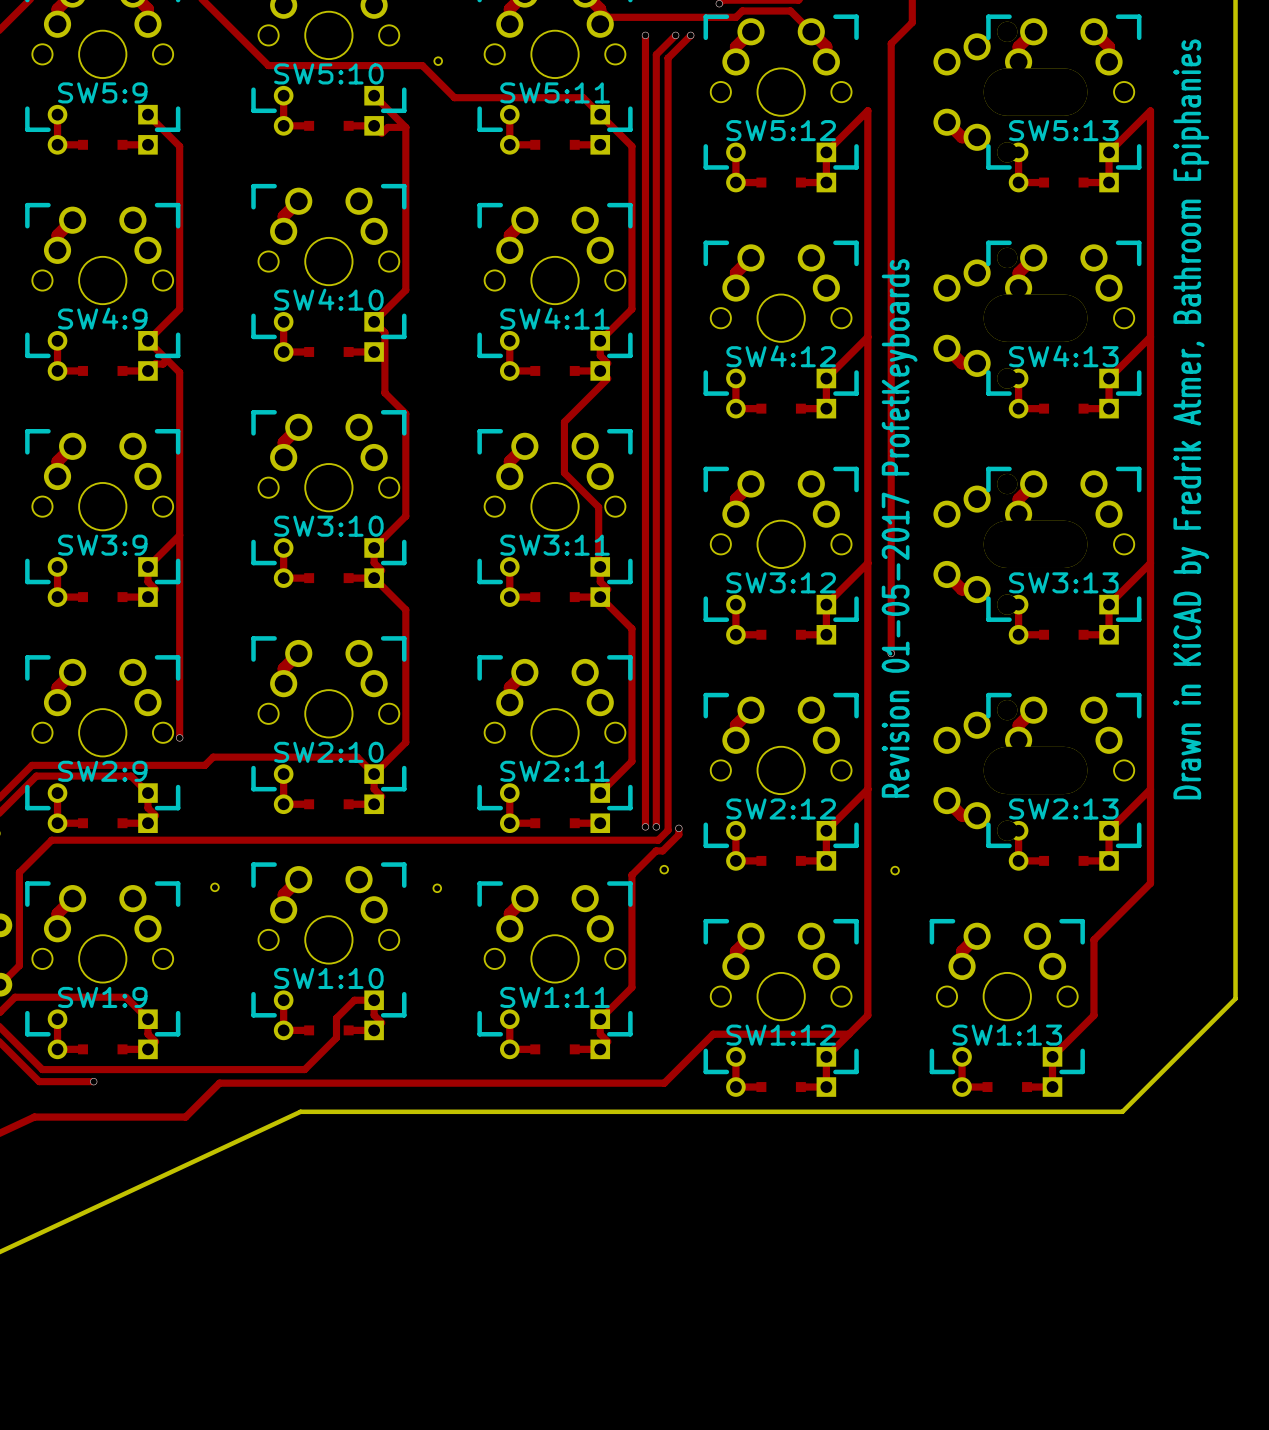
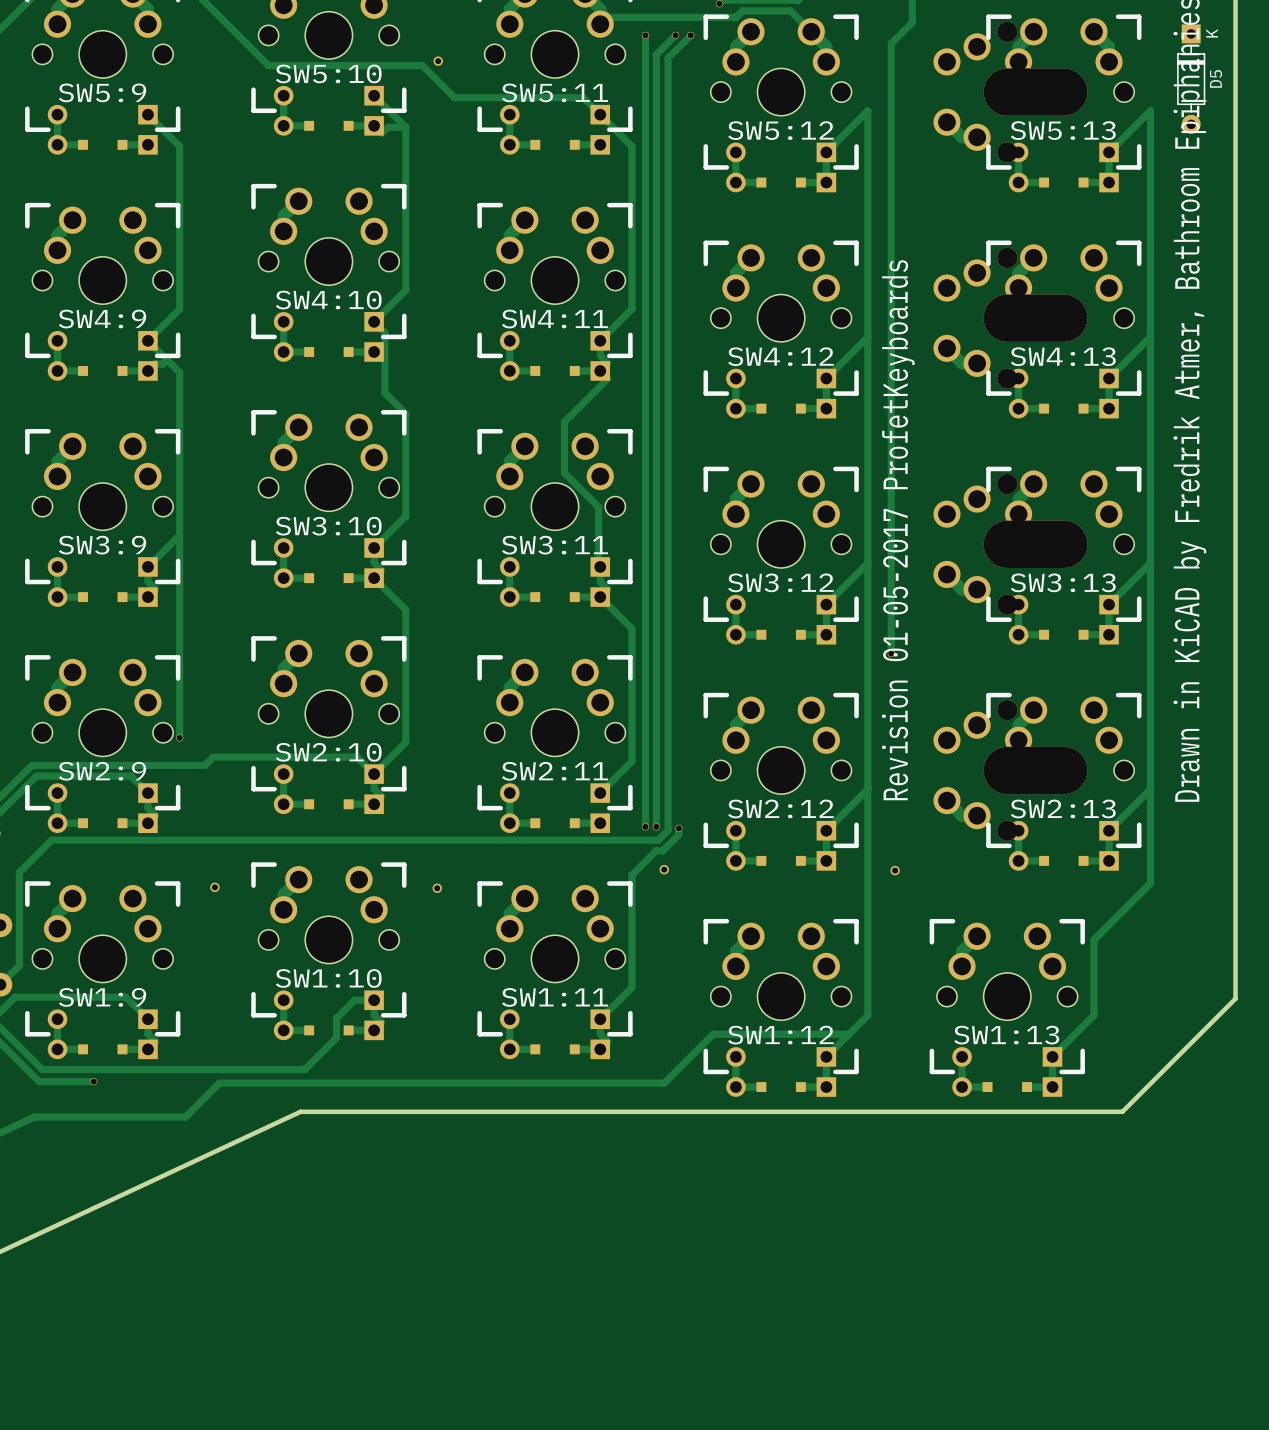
D5: none -> (1191, 79)

